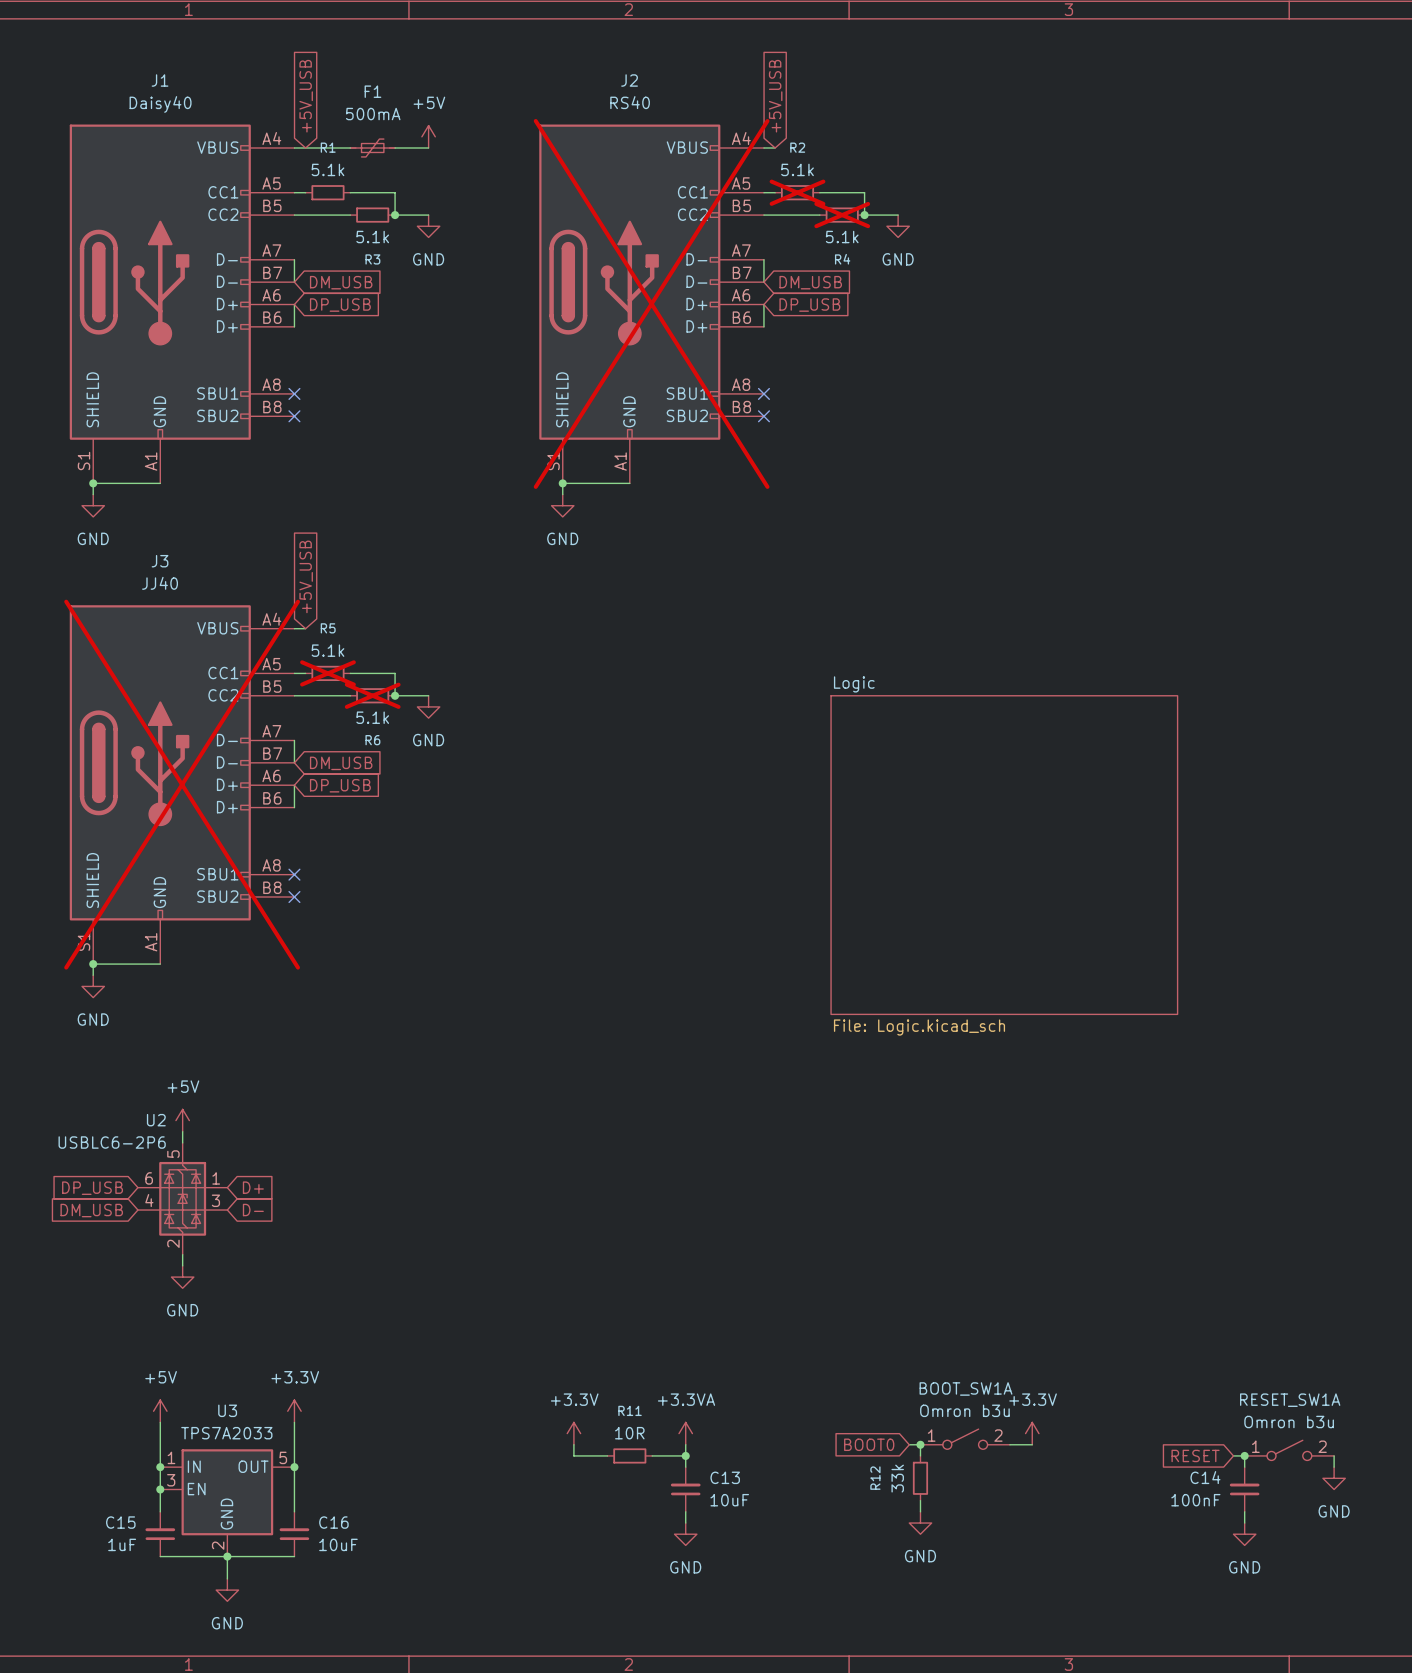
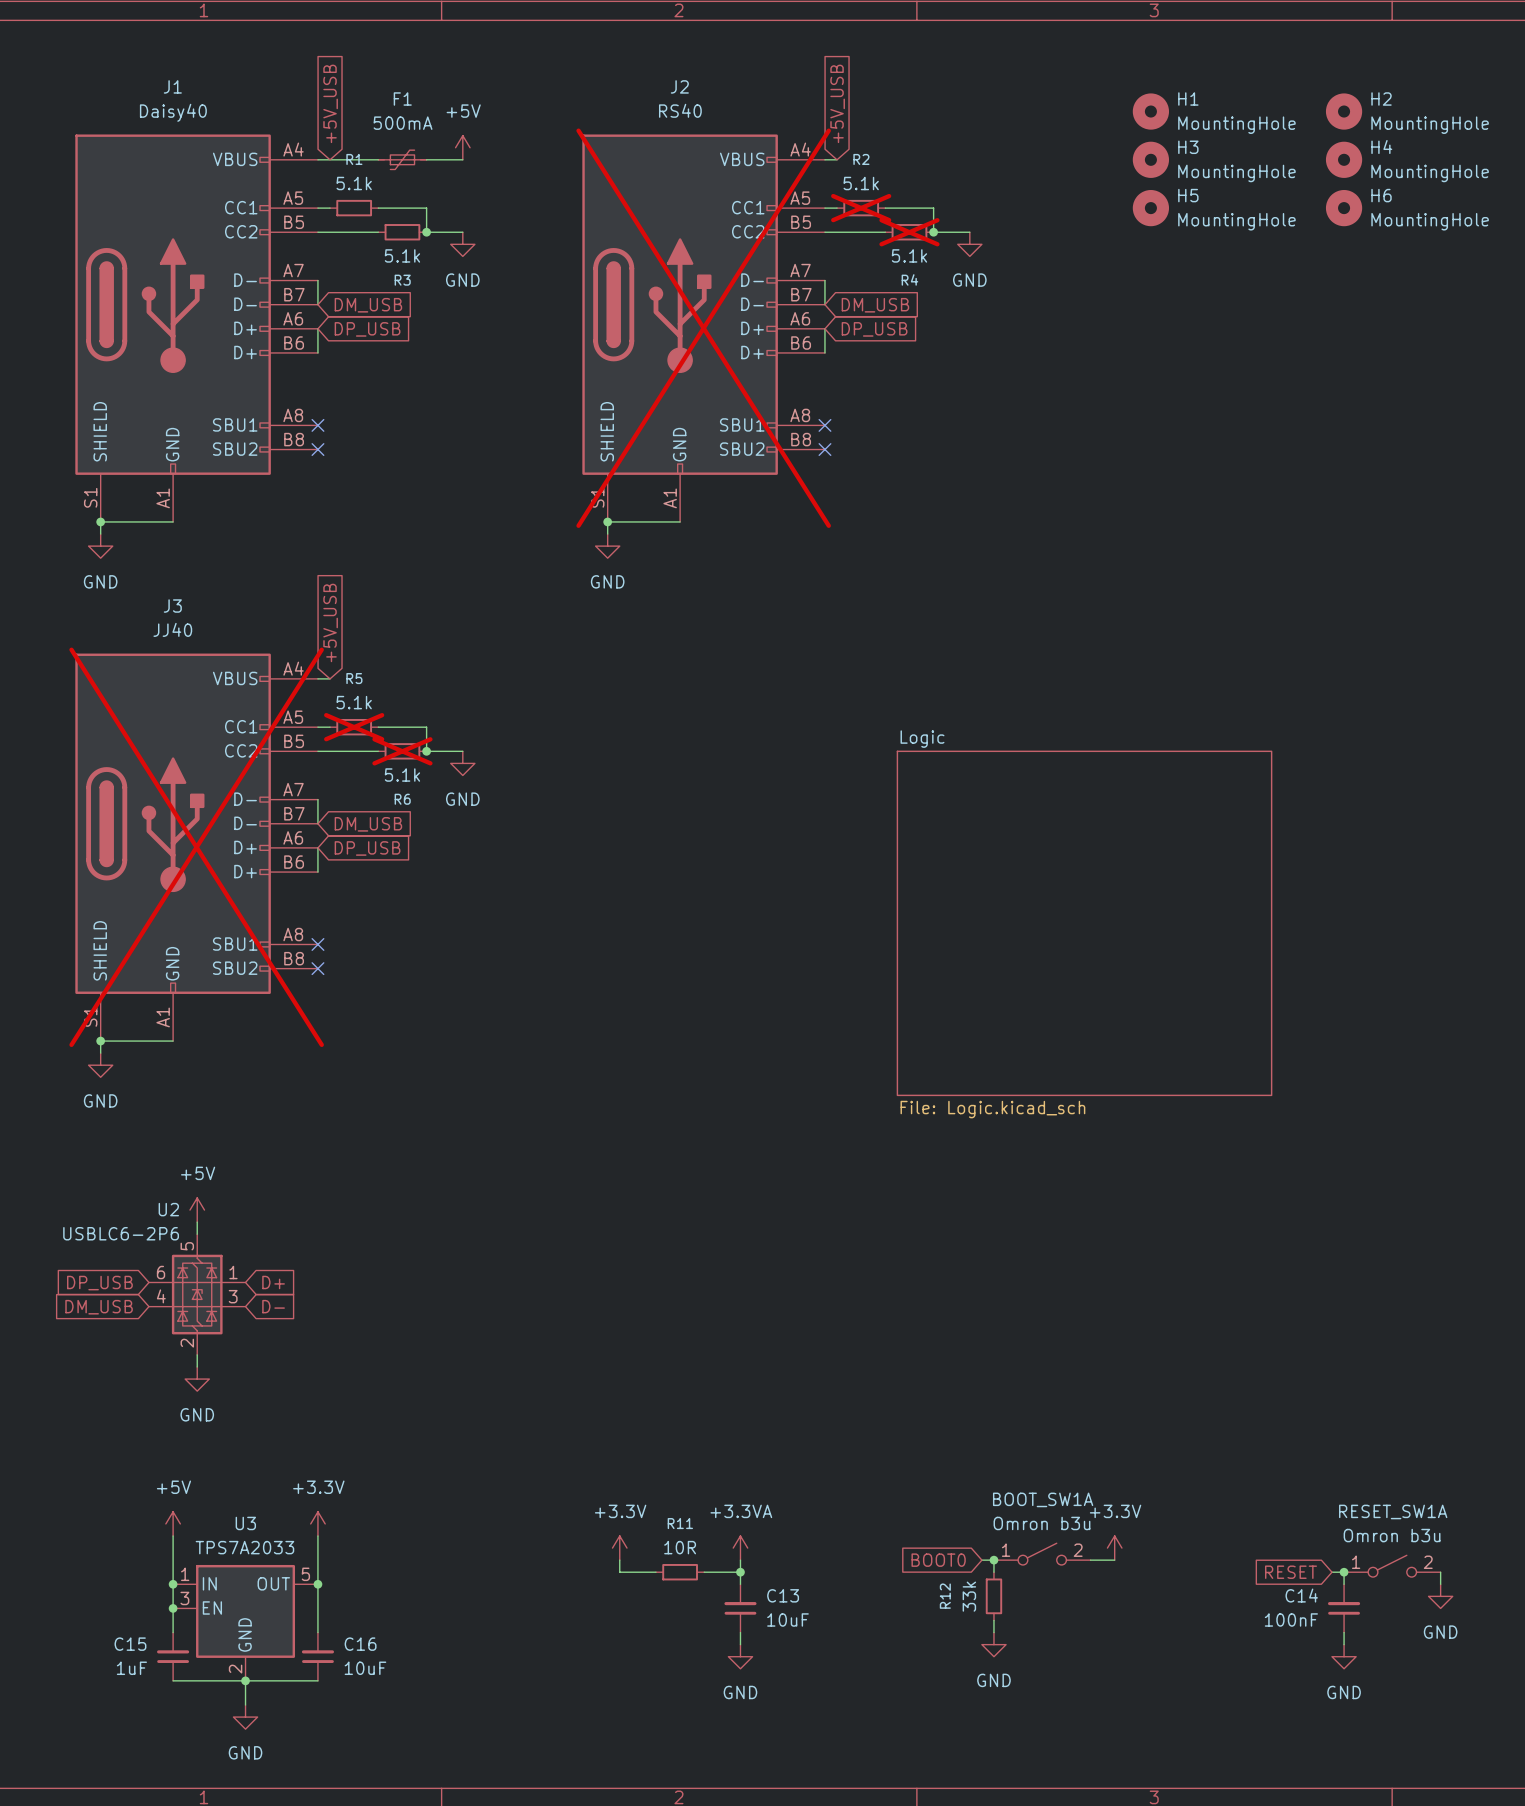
H1: none -> MountingHole (1150, 111)
H2: none -> MountingHole (1344, 111)
H3: none -> MountingHole (1150, 159)
H4: none -> MountingHole (1344, 159)
H5: none -> MountingHole (1150, 208)
H6: none -> MountingHole (1344, 208)

